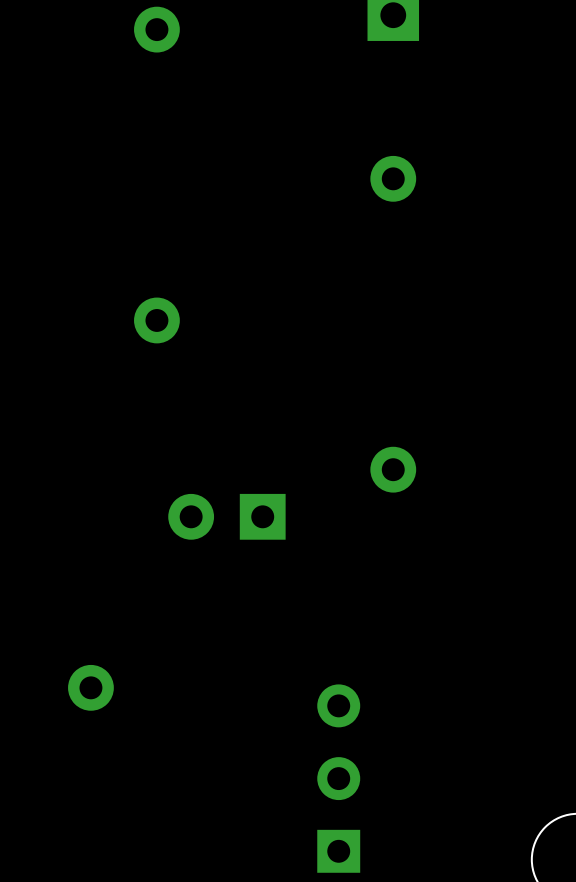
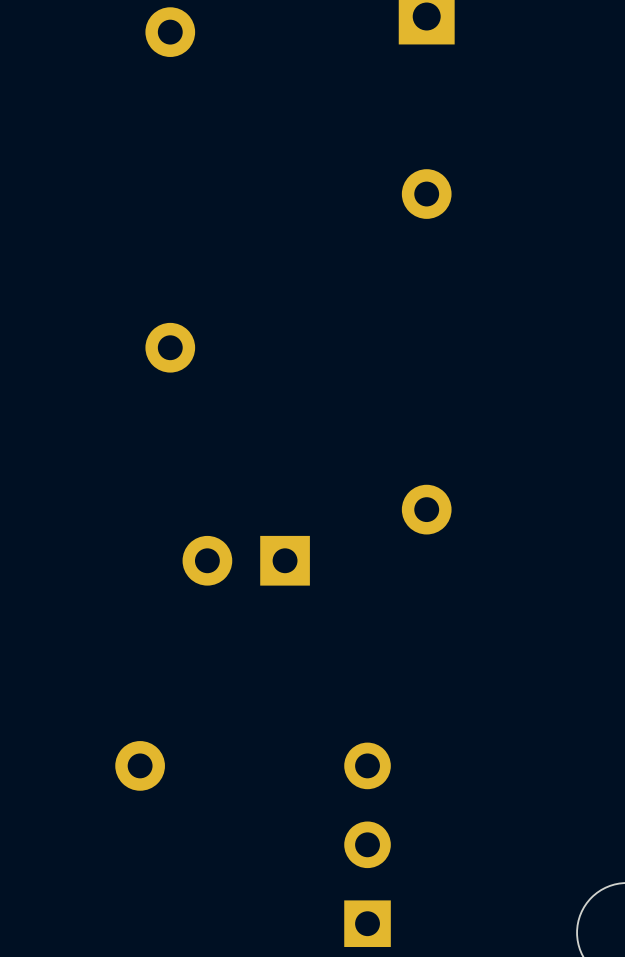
part position: (90, 687) -> (140, 765)

